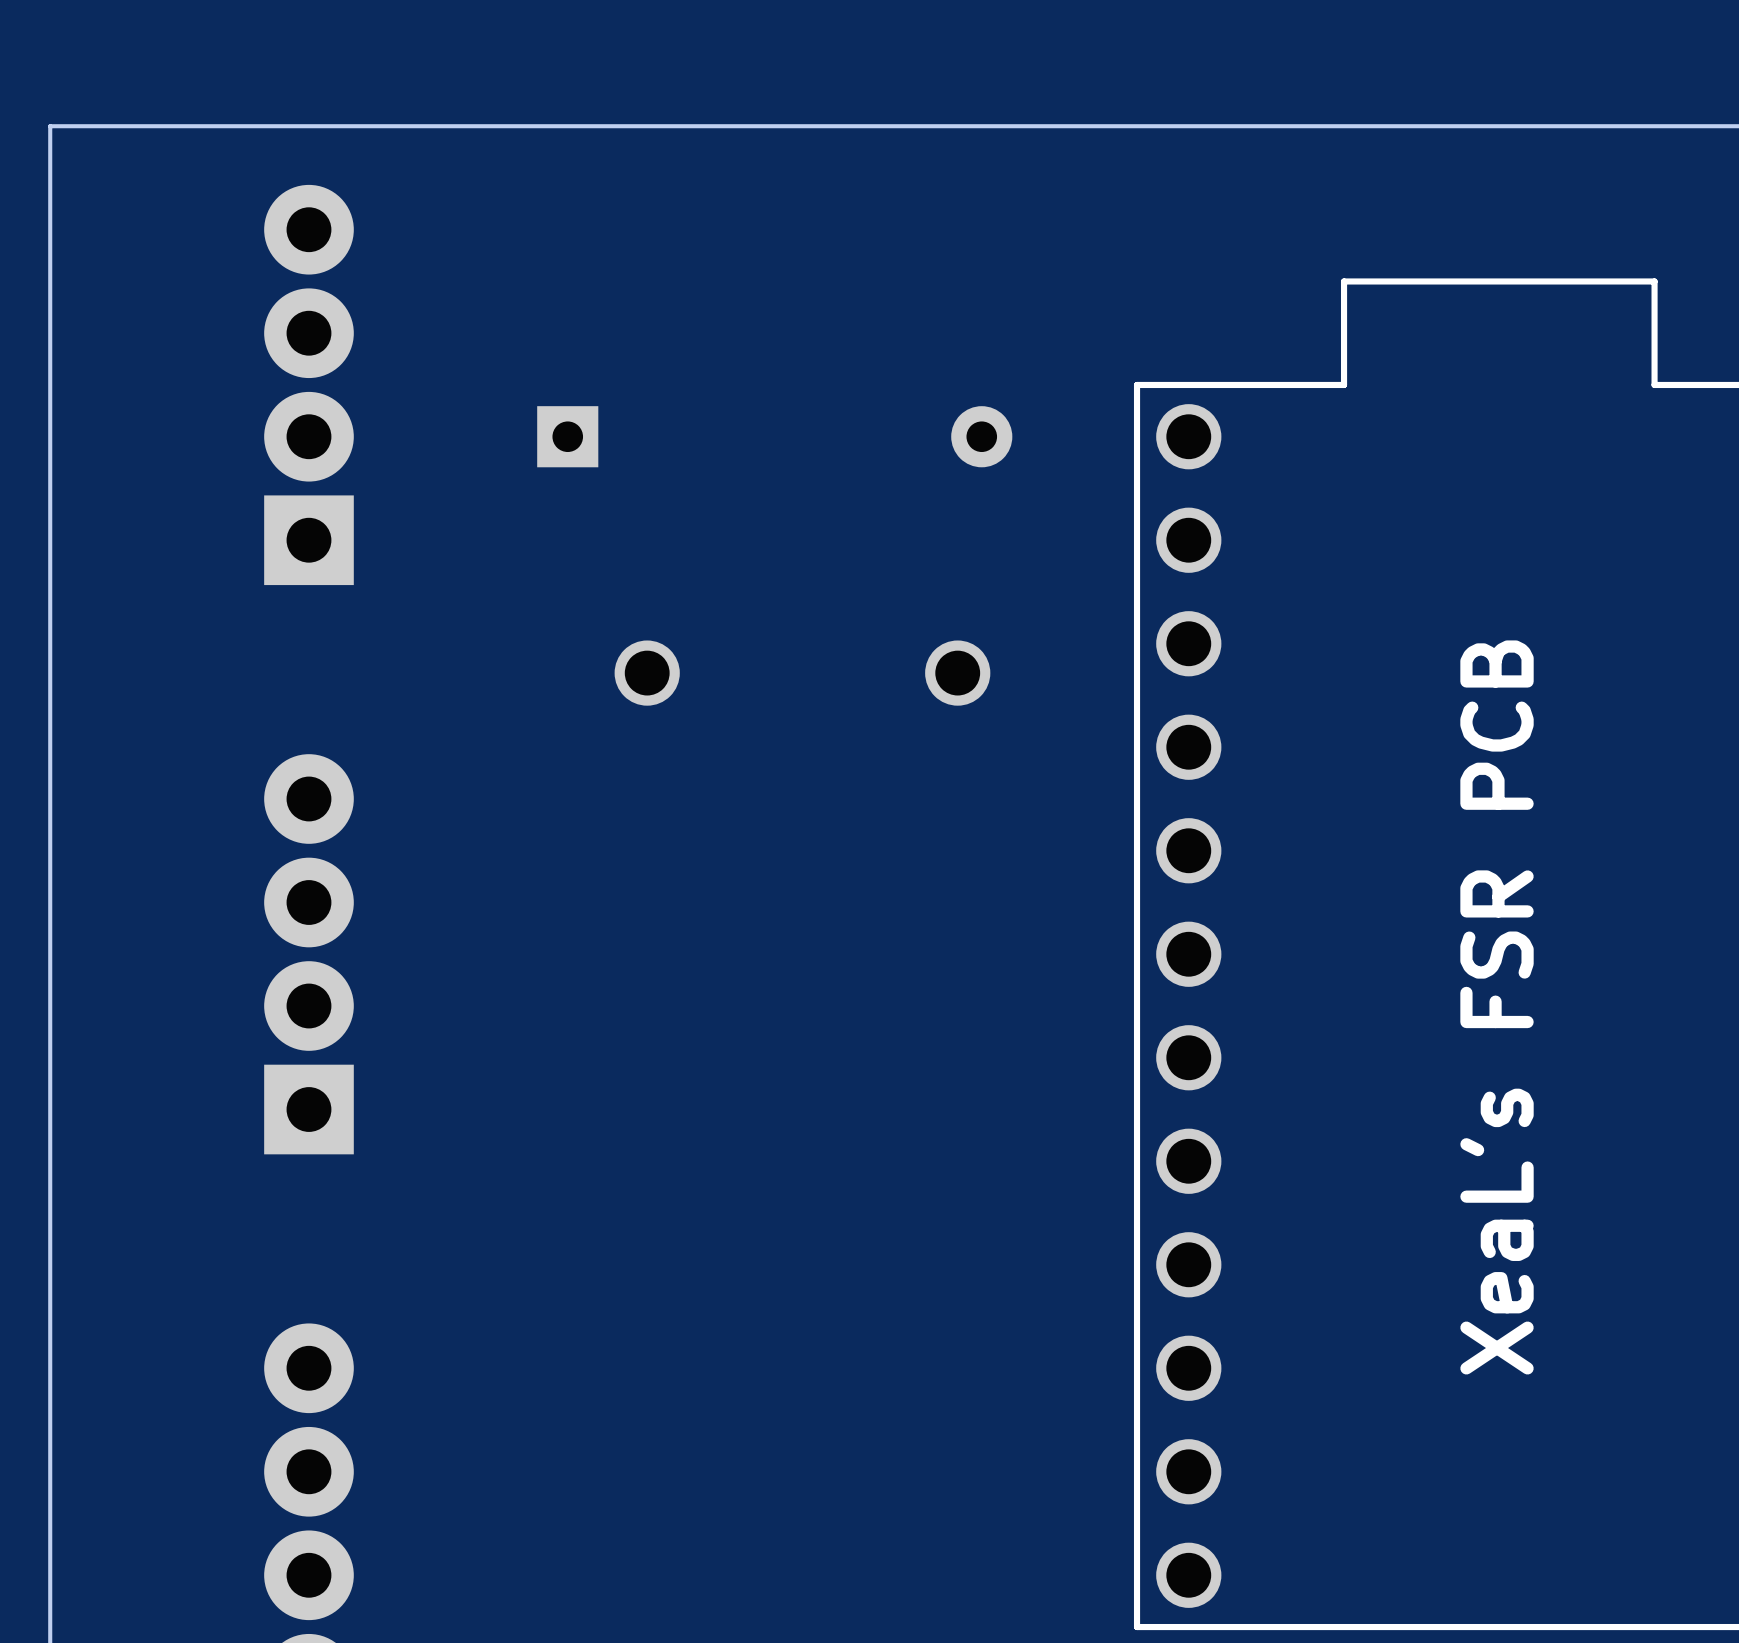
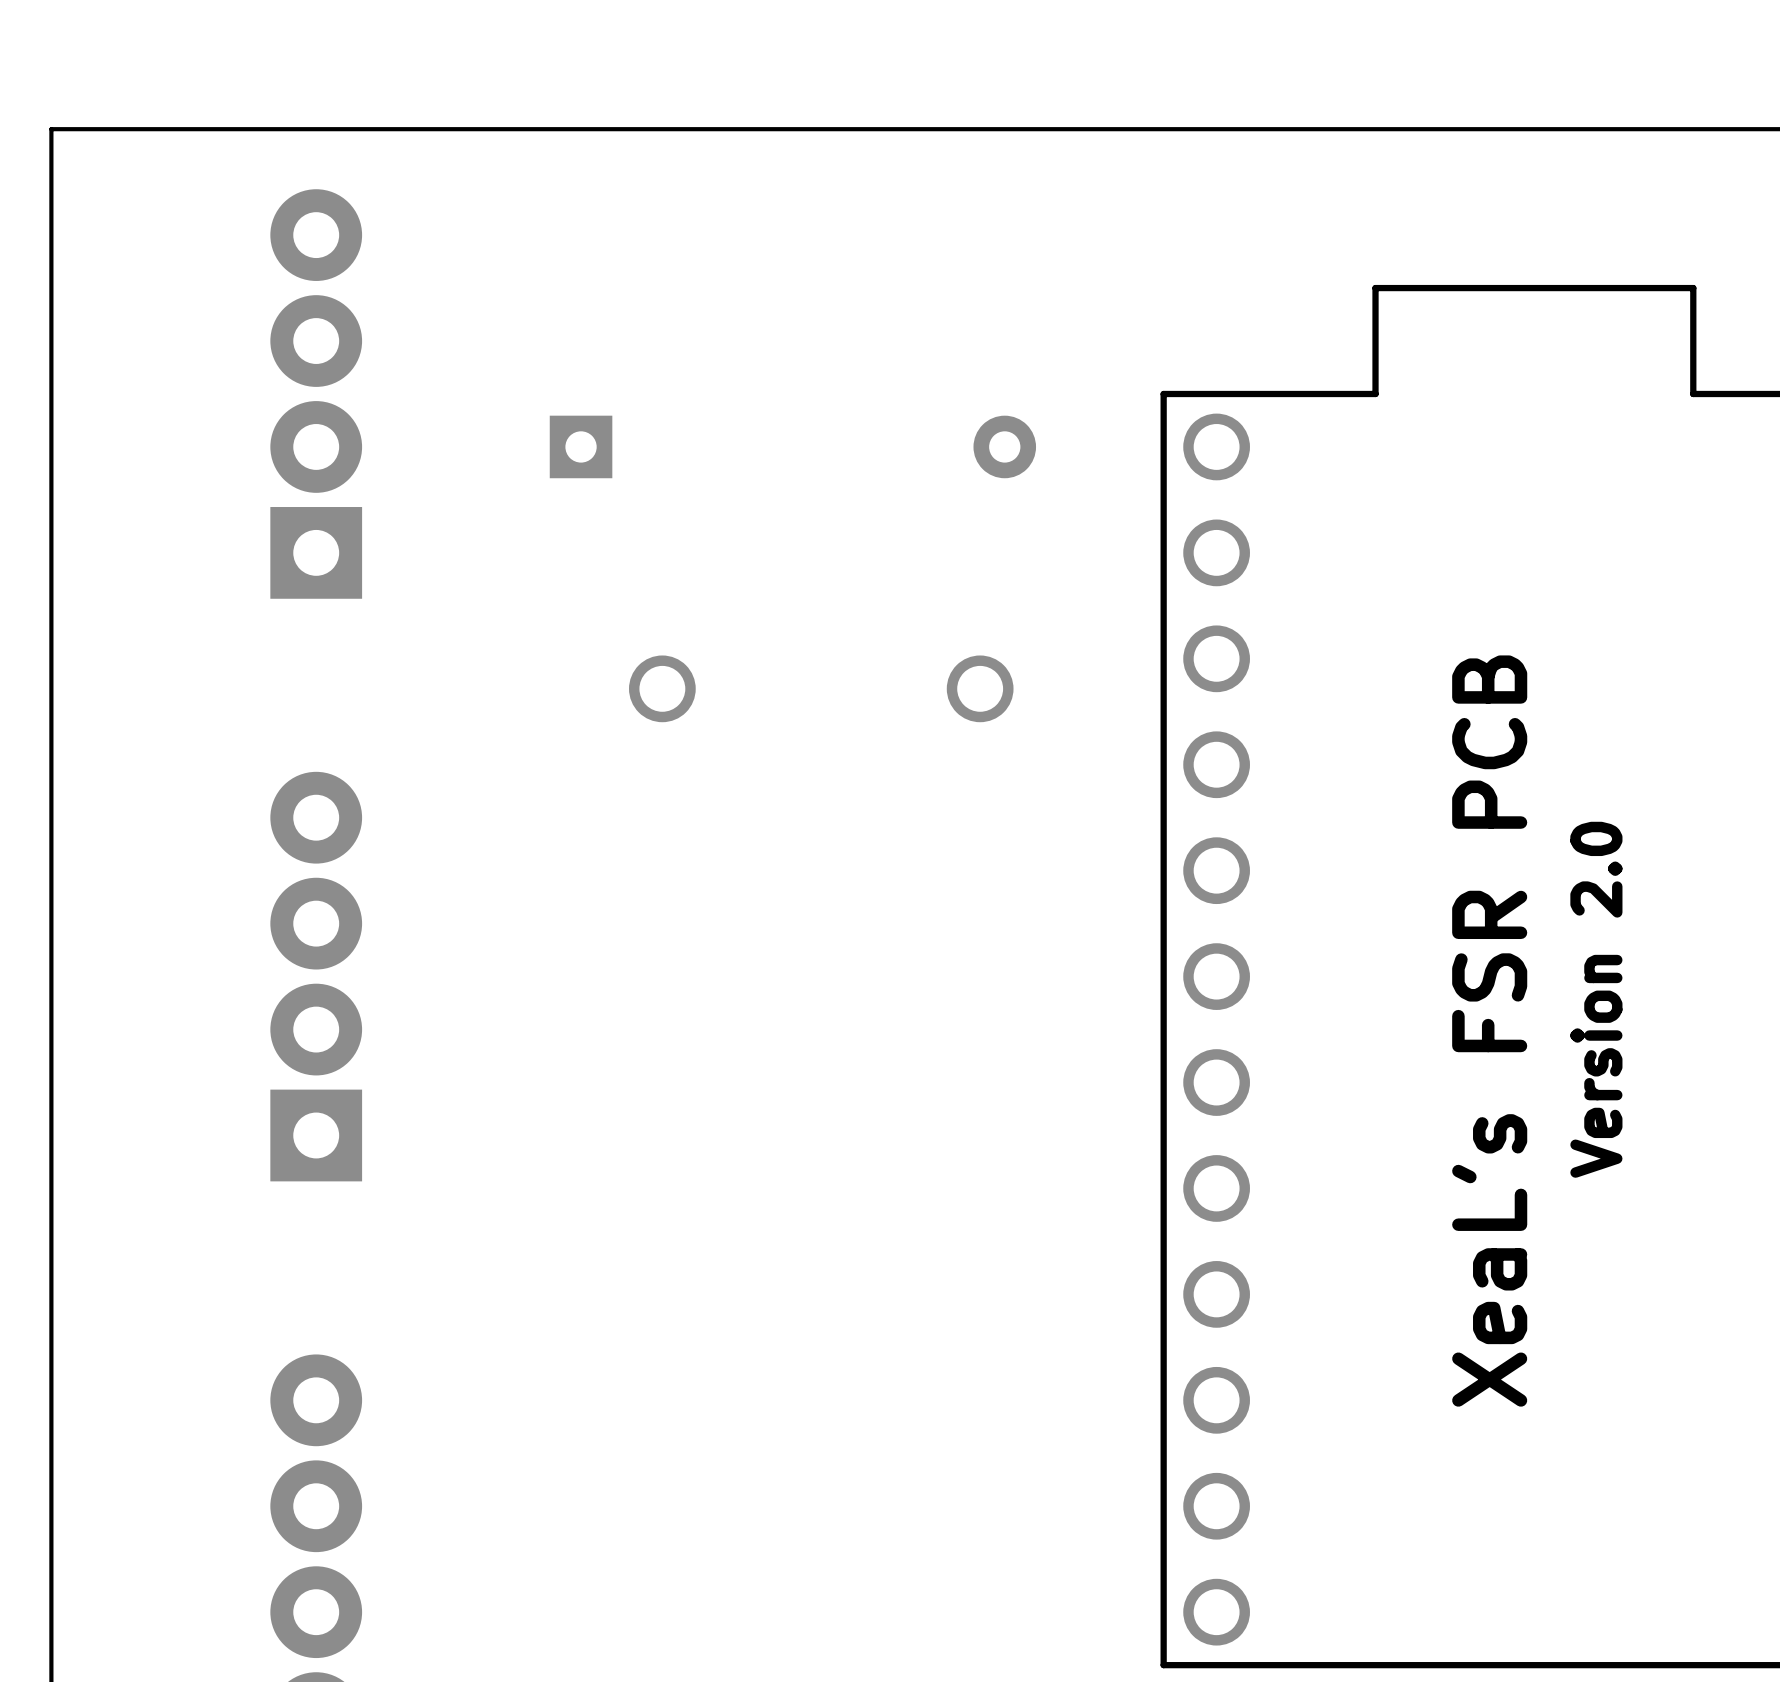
text: none -> Version 2.0 (1596, 999)
text position: XeaL's FSR PCB (1497, 1007) -> XeaL's FSR PCB (1489, 1031)

